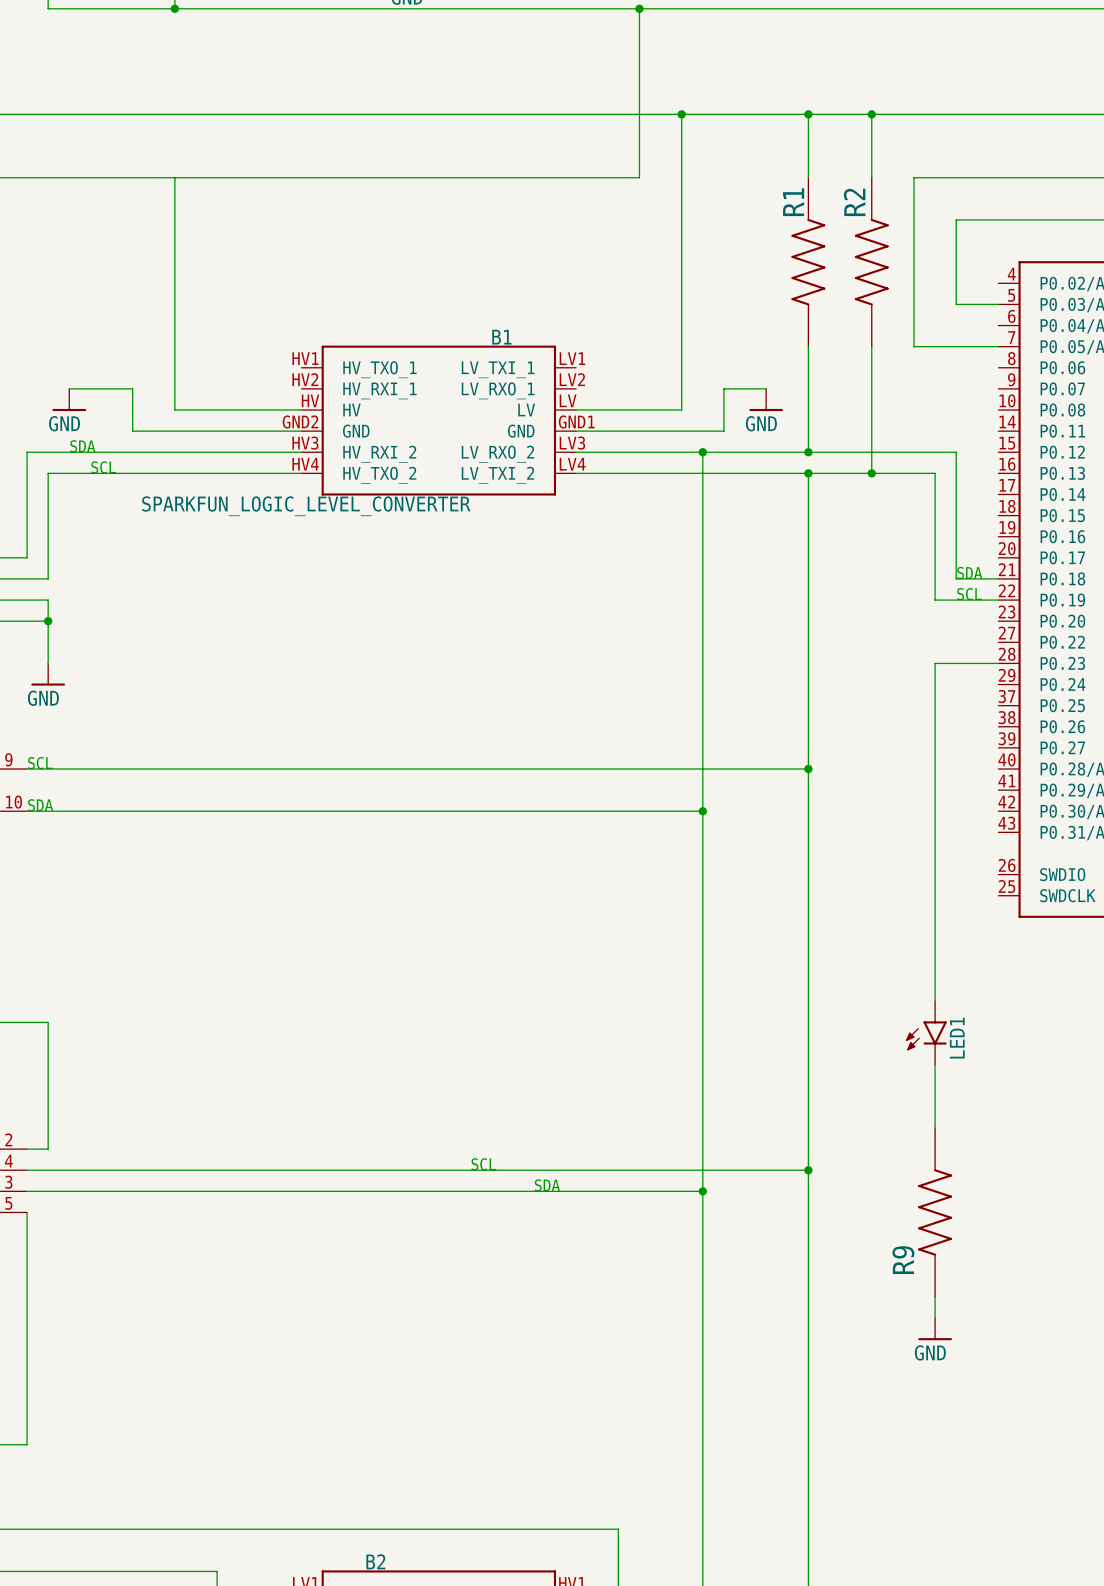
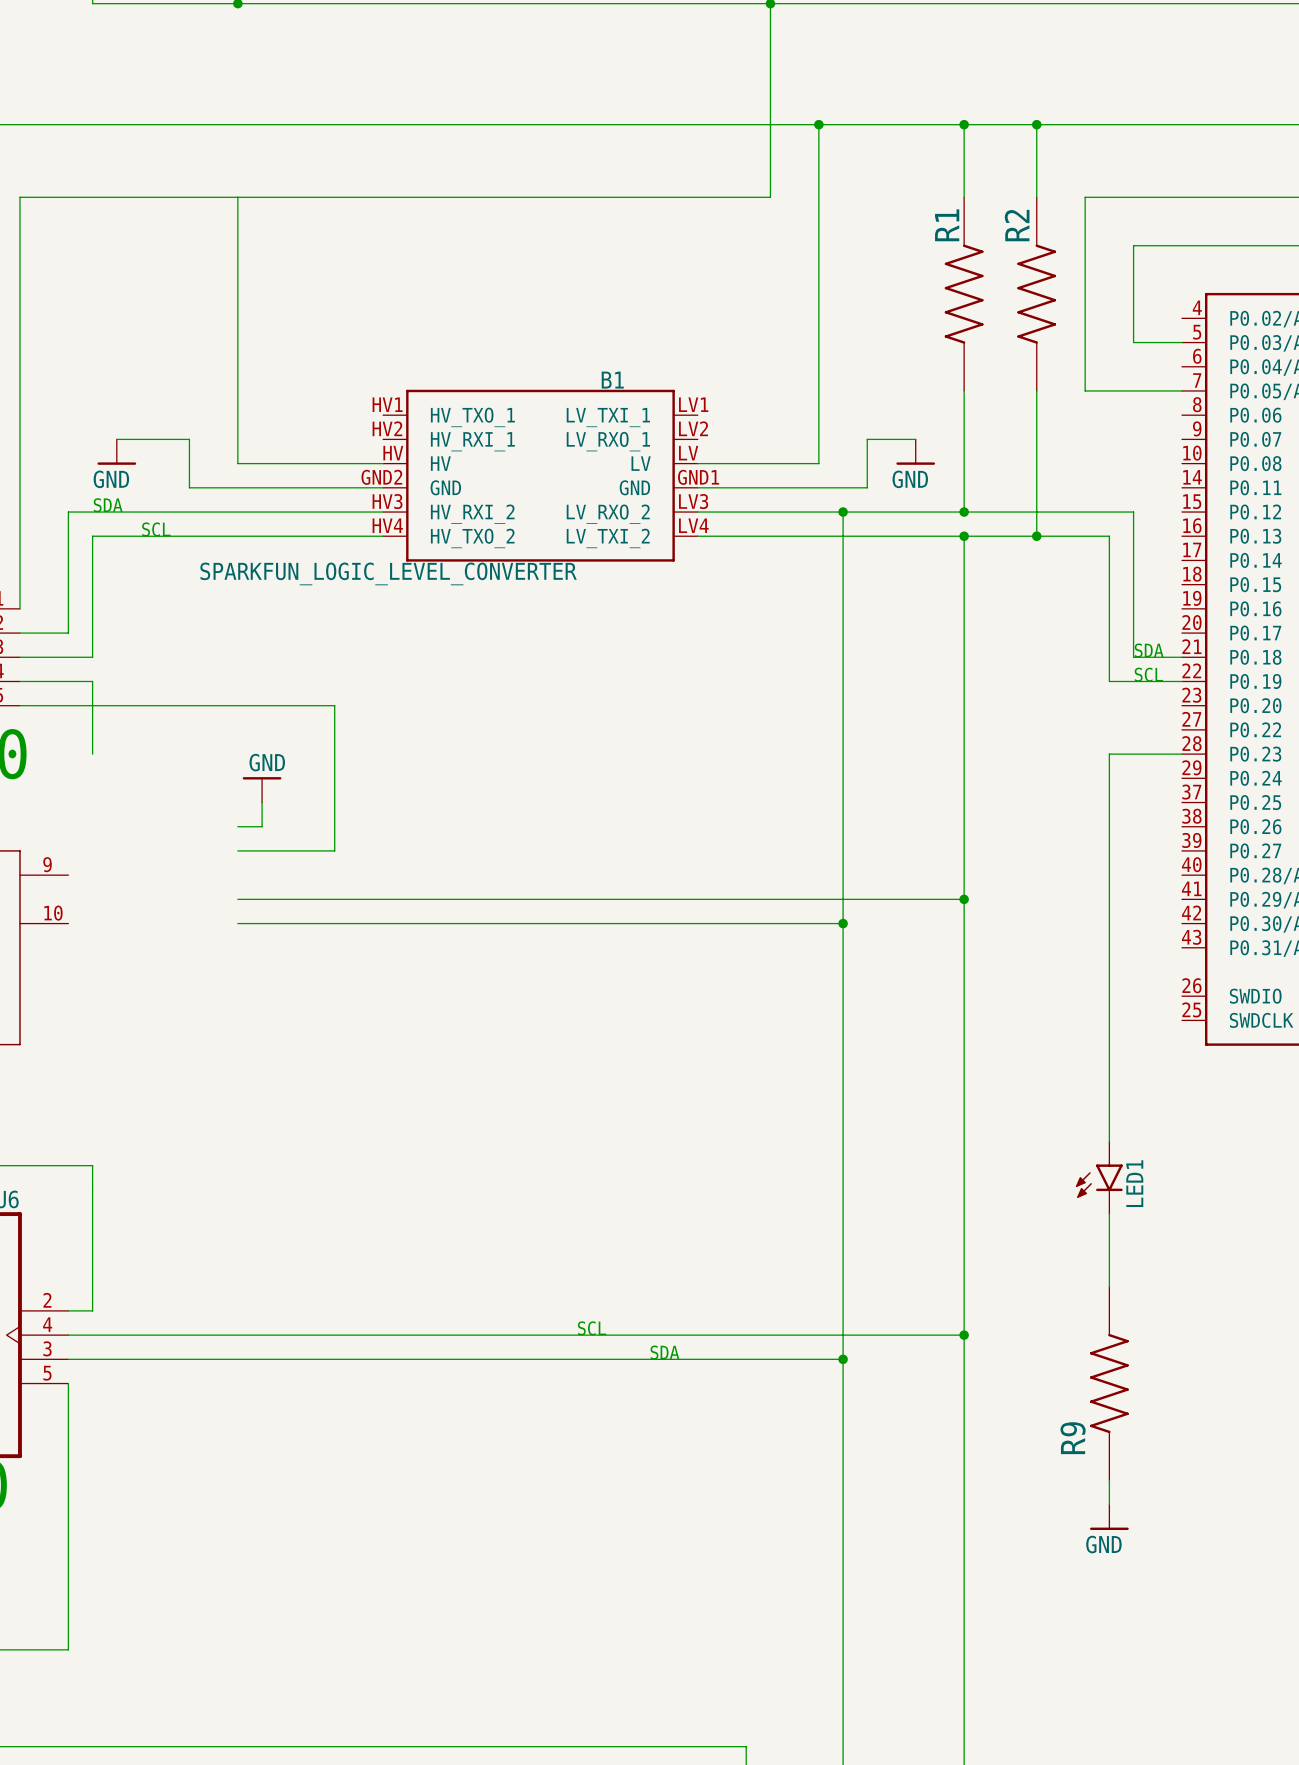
text position: SDA (82, 446) -> SDA (108, 505)
wire: none -> (92, 705) (334, 705) (334, 850) (237, 850)
junction: (48, 621) -> none
power symbol: GND (48, 674) -> none
power symbol: none -> GND (262, 789)
wire: none -> (262, 802) (262, 826) (237, 826)
text: SCL (40, 763) -> none
wire: (27, 769) (808, 769) -> none
junction position: (808, 769) -> (964, 899)
wire: none -> (237, 899) (964, 899)
text: SDA (40, 805) -> none
wire: (27, 811) (174, 811) -> none

